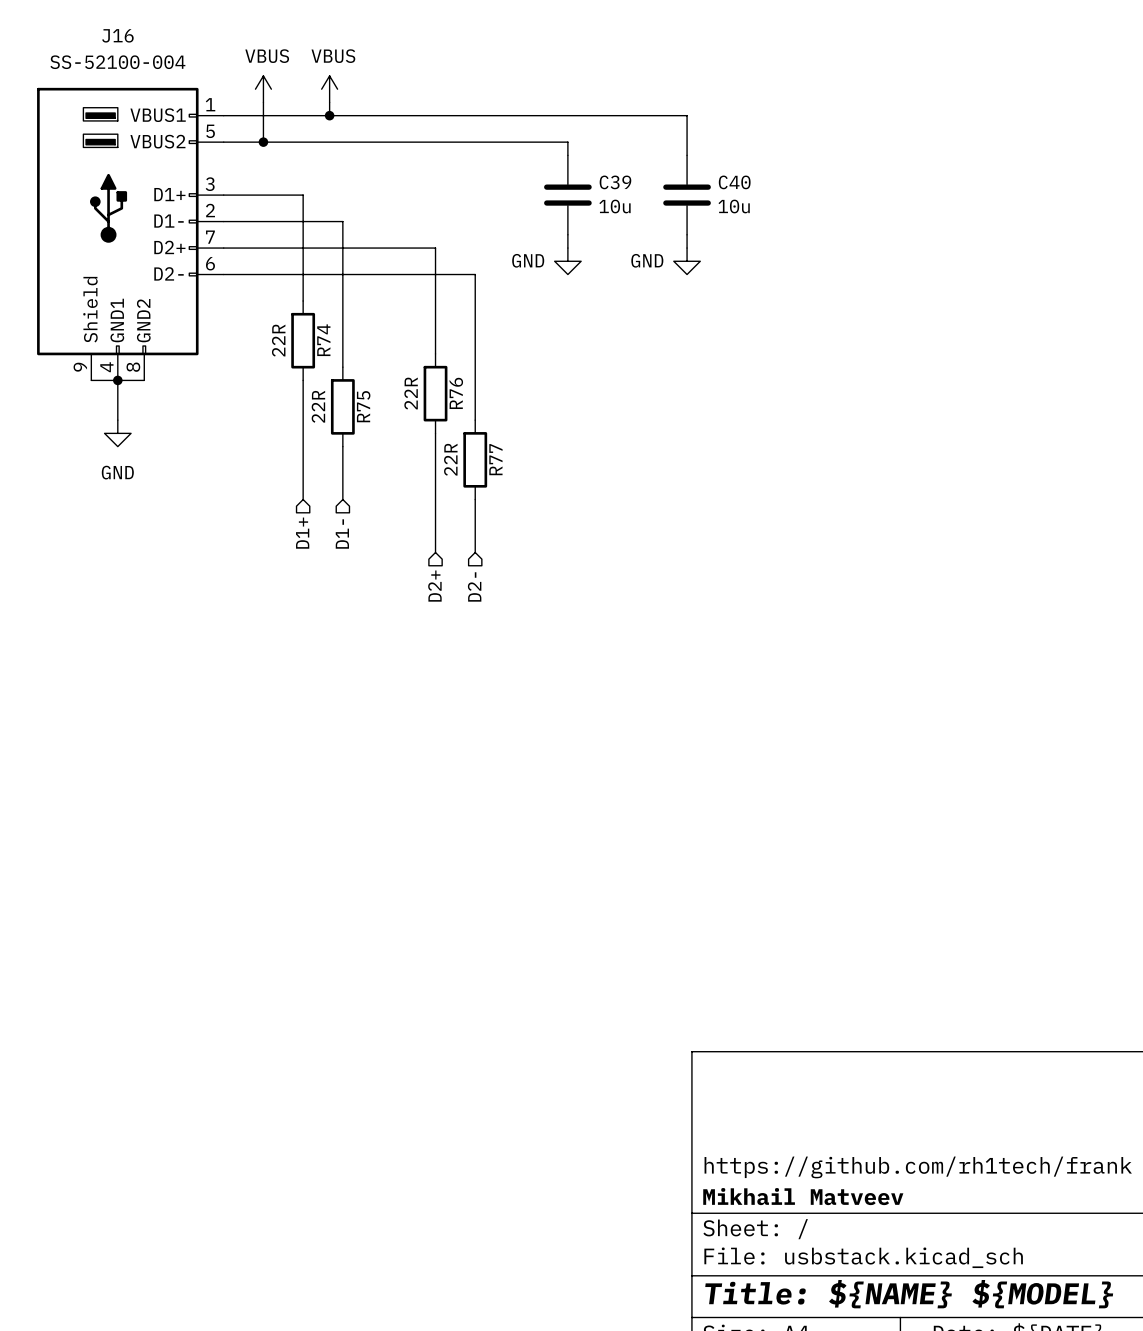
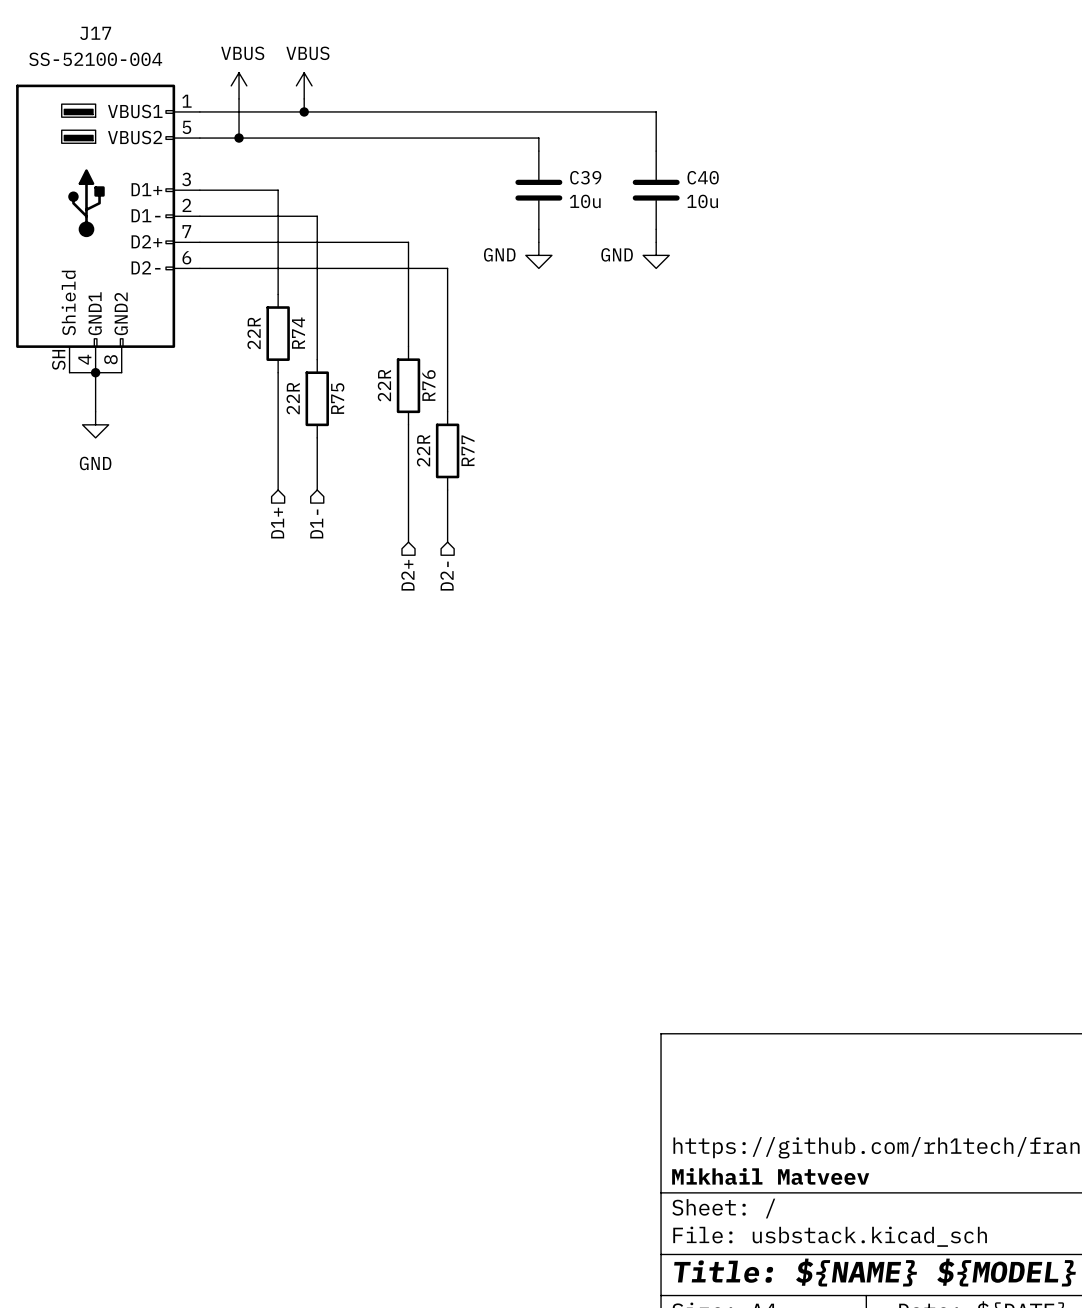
J16 name: J16 (117, 35) -> J17 (95, 33)
J16 pin number: 9 (80, 367) -> SH (58, 359)

